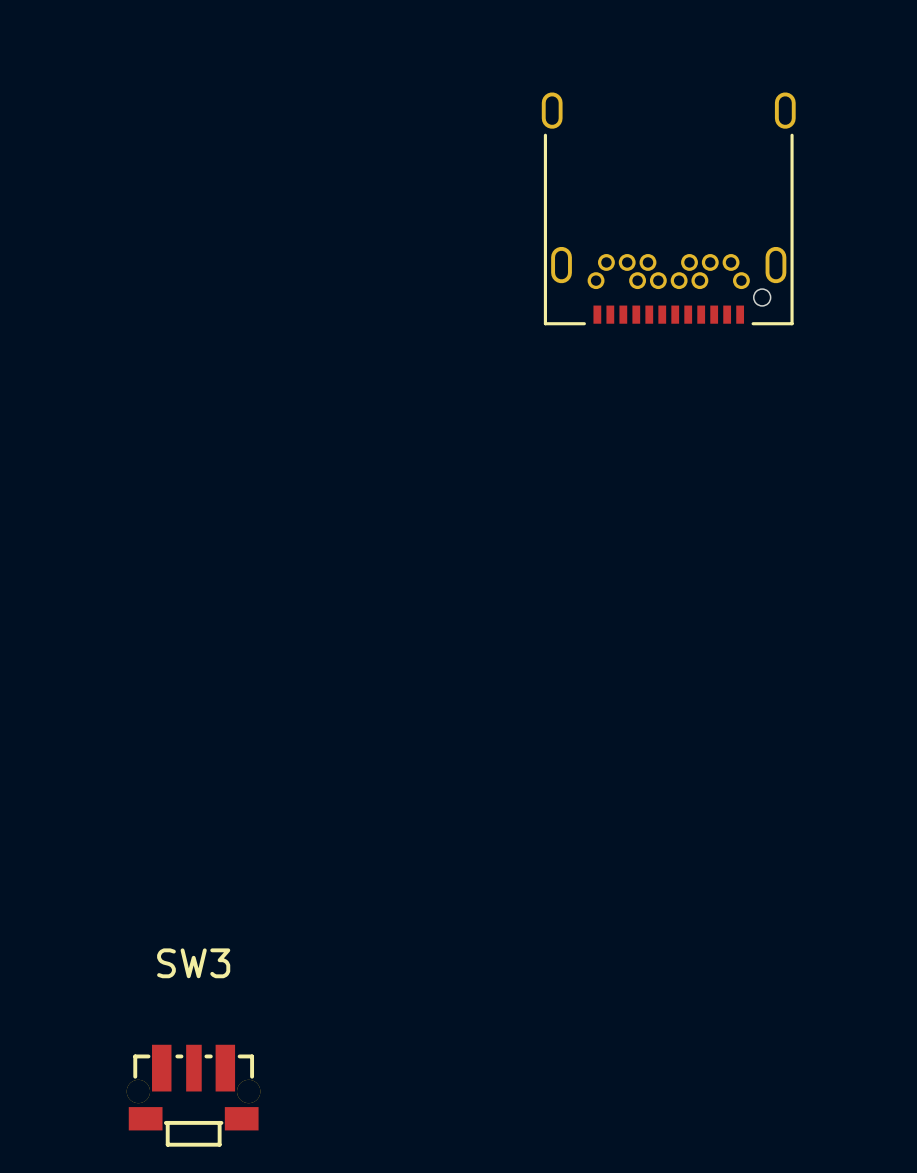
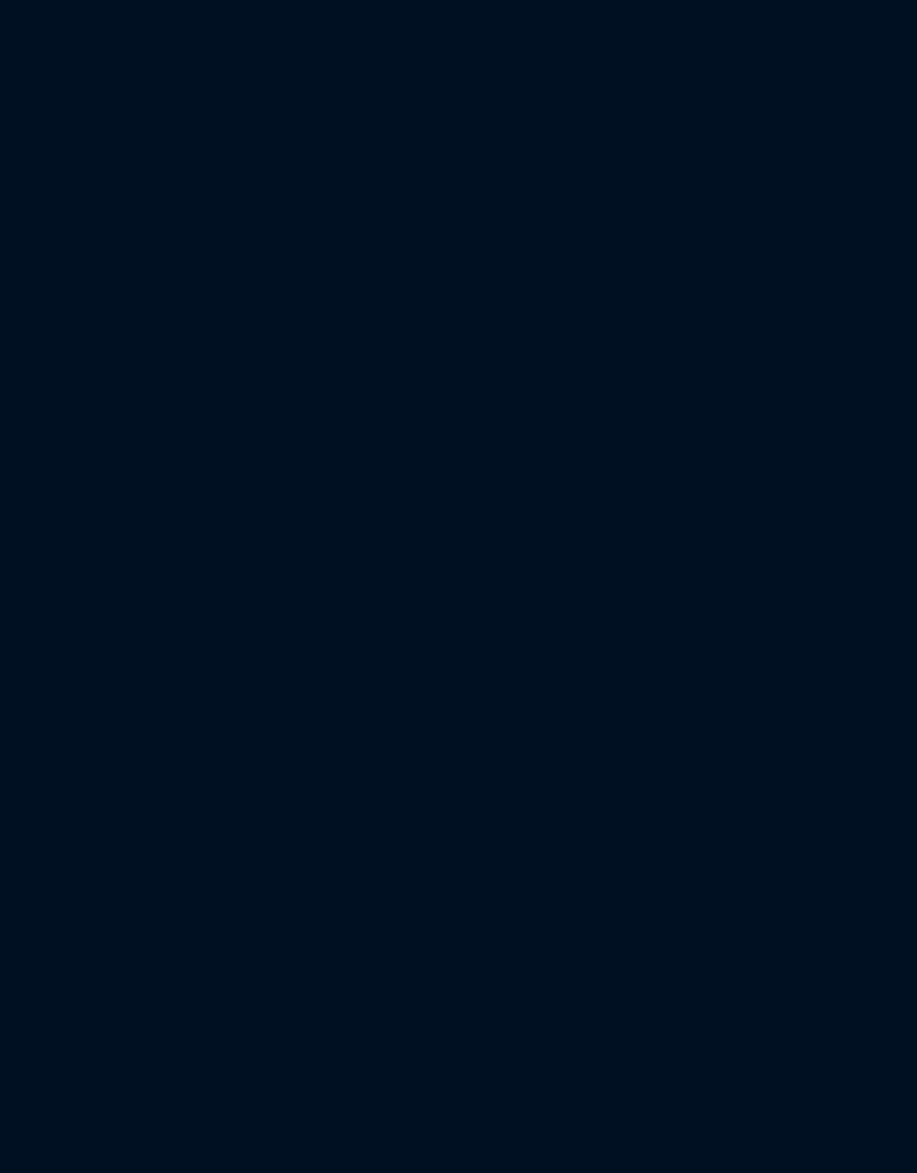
part: (668, 208) -> none
SW3: (193, 1095) -> none

